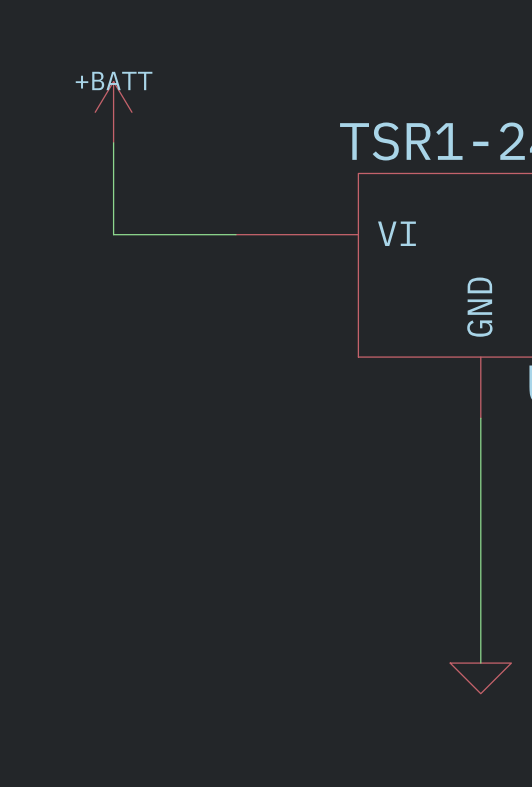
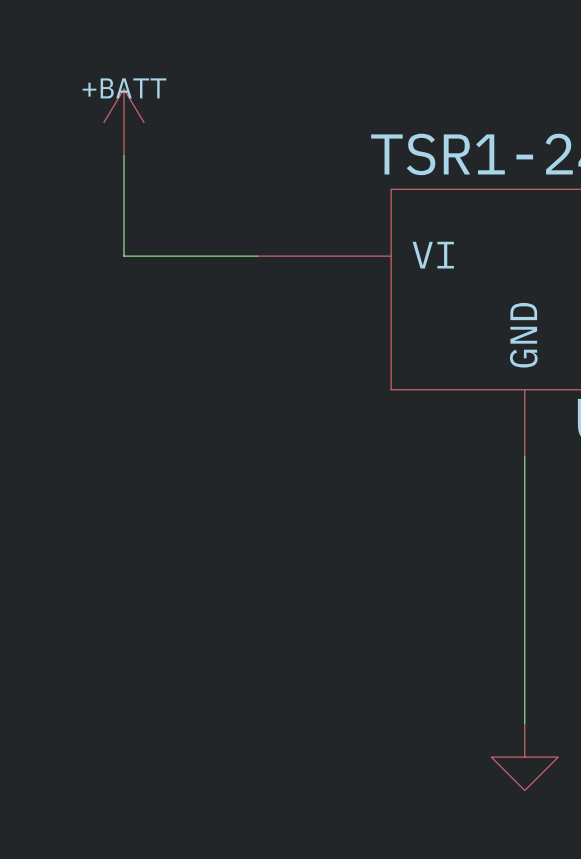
power symbol shape: [450, 663, 512, 694] -> [491, 723, 559, 791]

